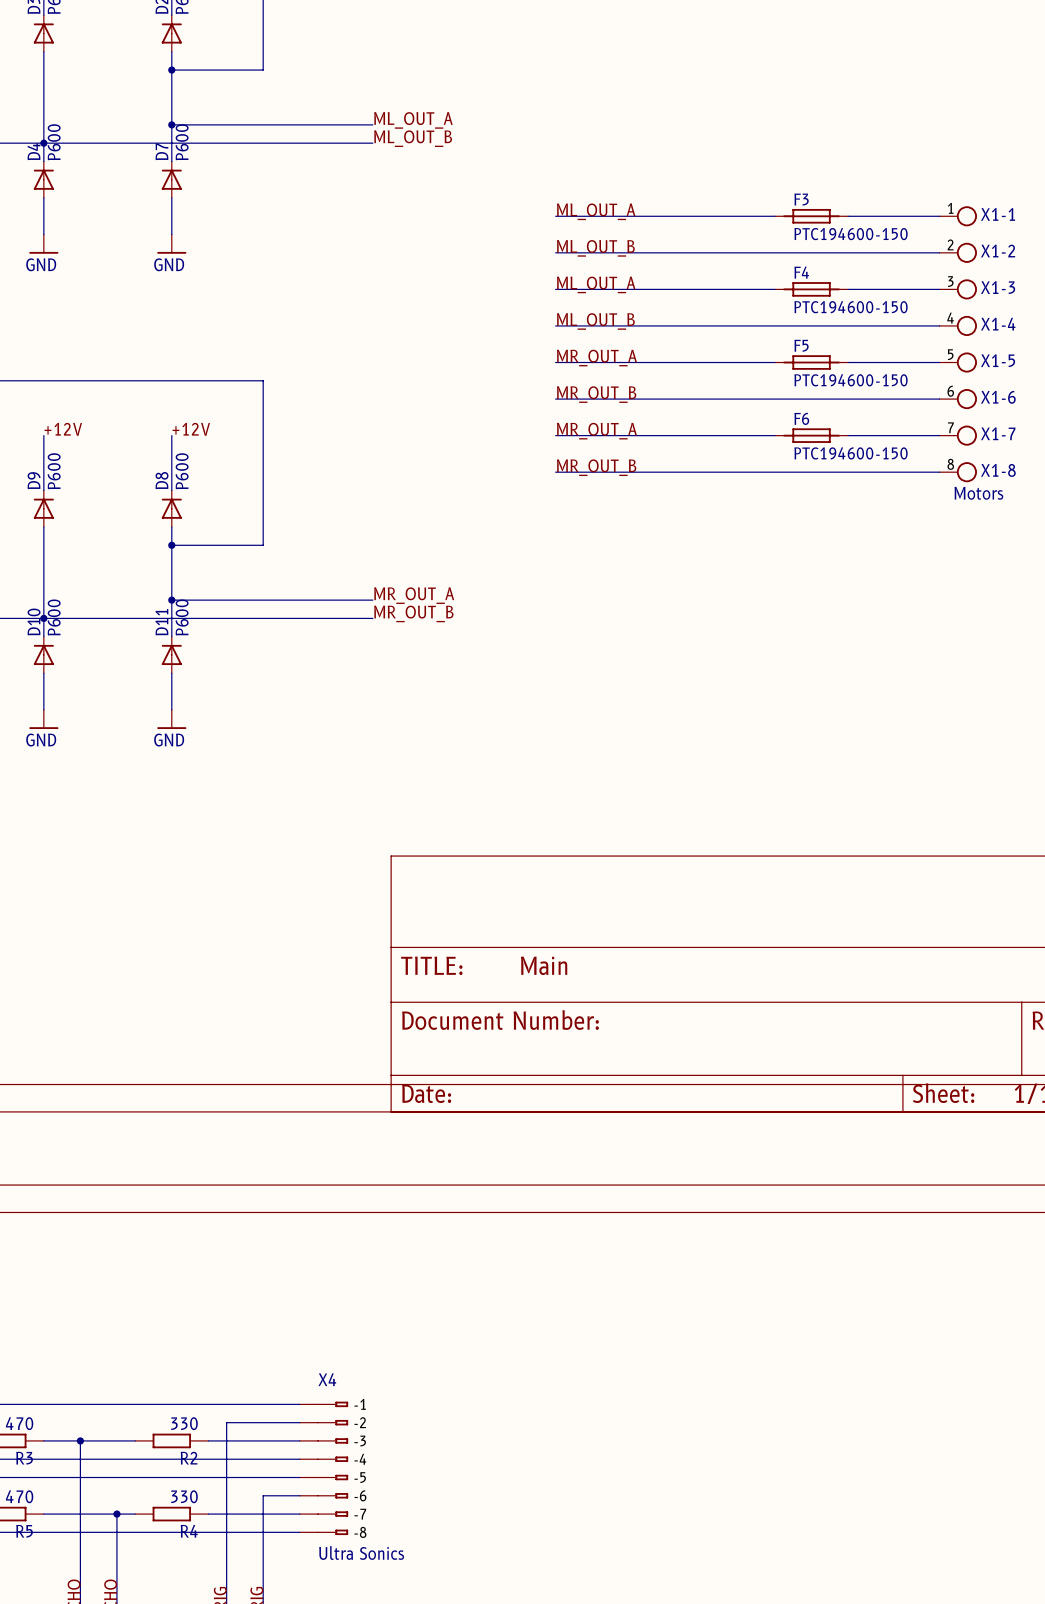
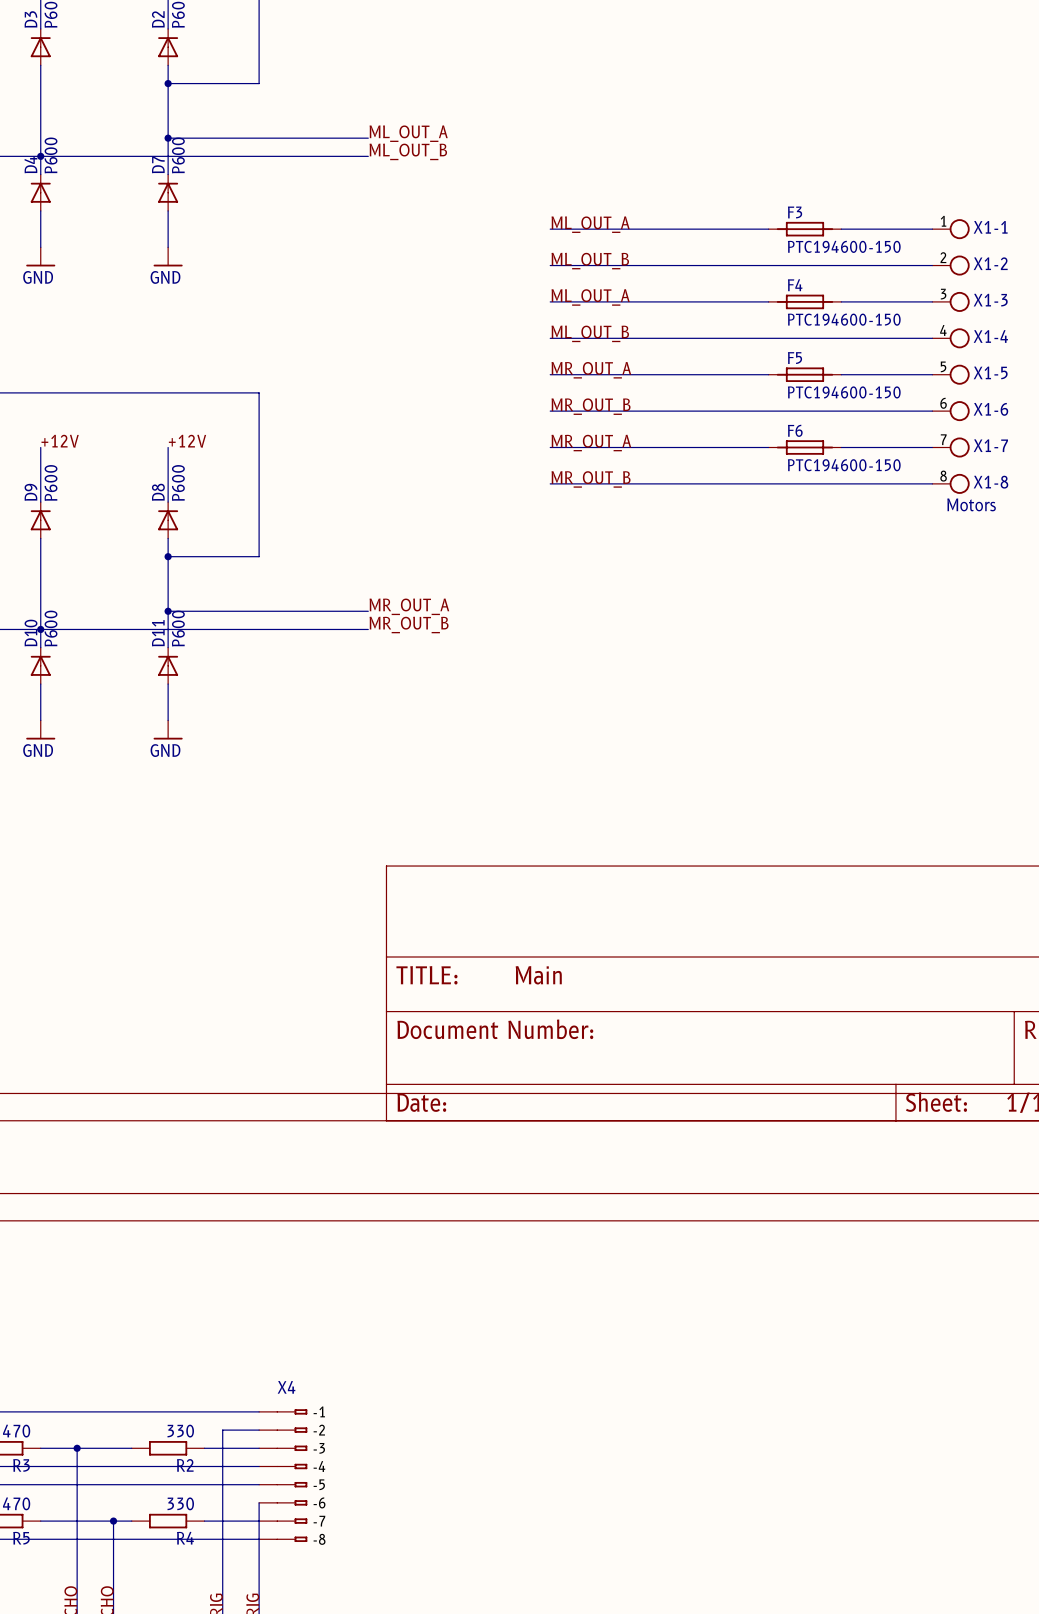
X4 position: (323, 1468) -> (283, 1475)
X4 value: Ultra Sonics (361, 1553) -> none

